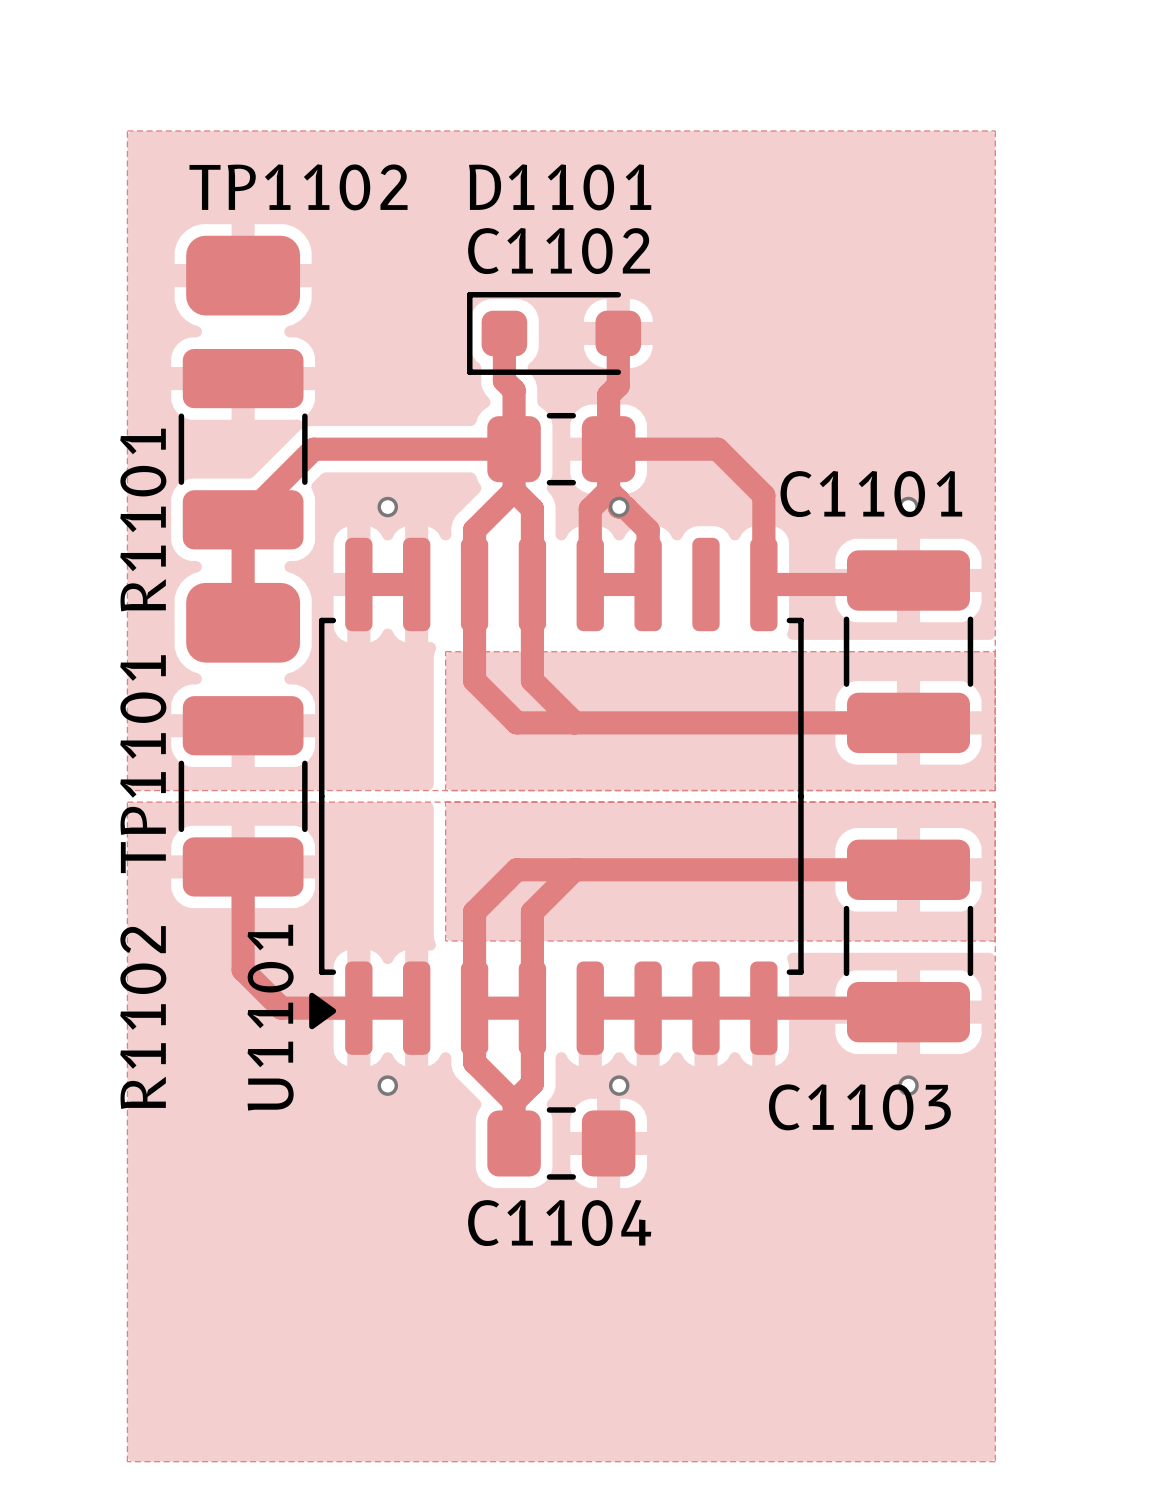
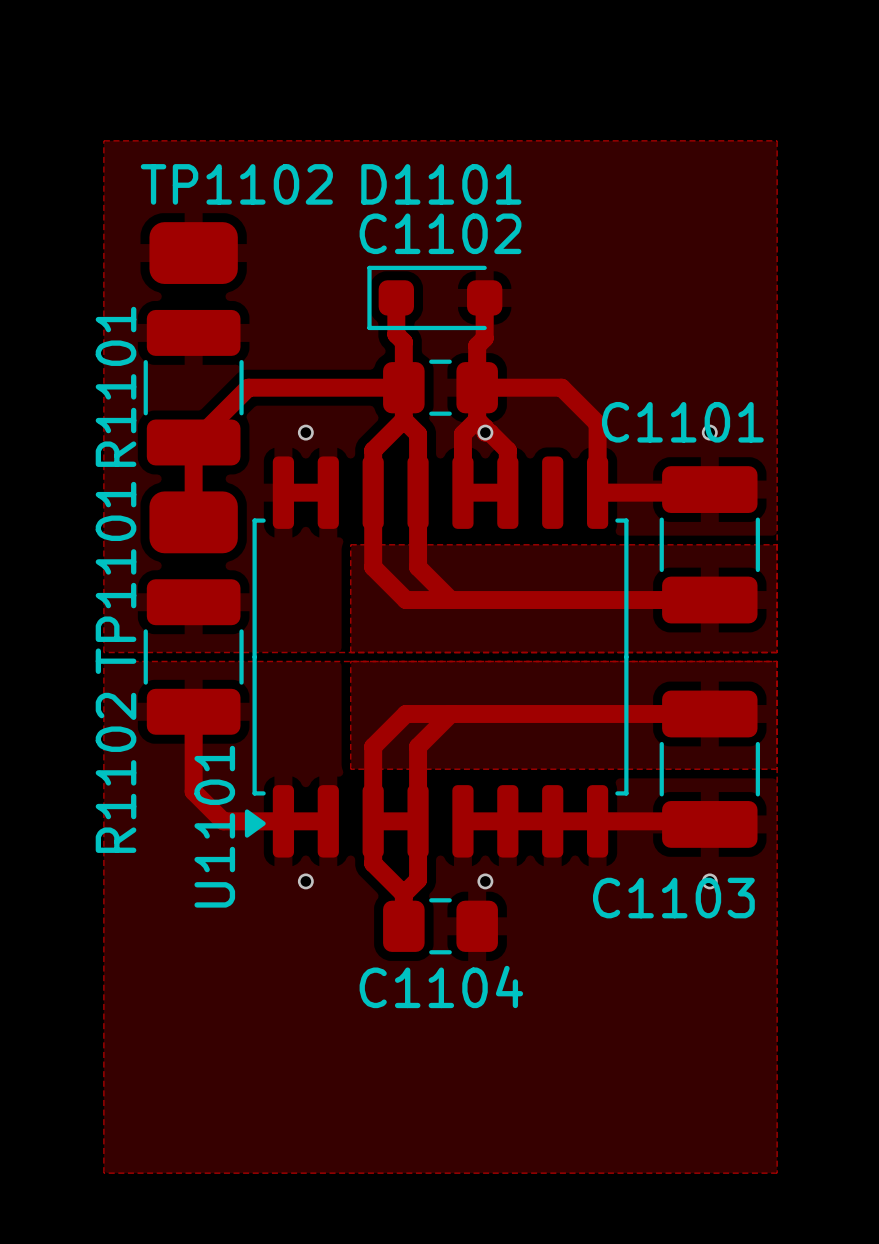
R1101 name position: R1101 (143, 520) -> R1101 (116, 386)
TP1101 name position: TP1101 (143, 764) -> TP1101 (116, 577)
R1102 name position: R1102 (143, 1017) -> R1102 (116, 772)

